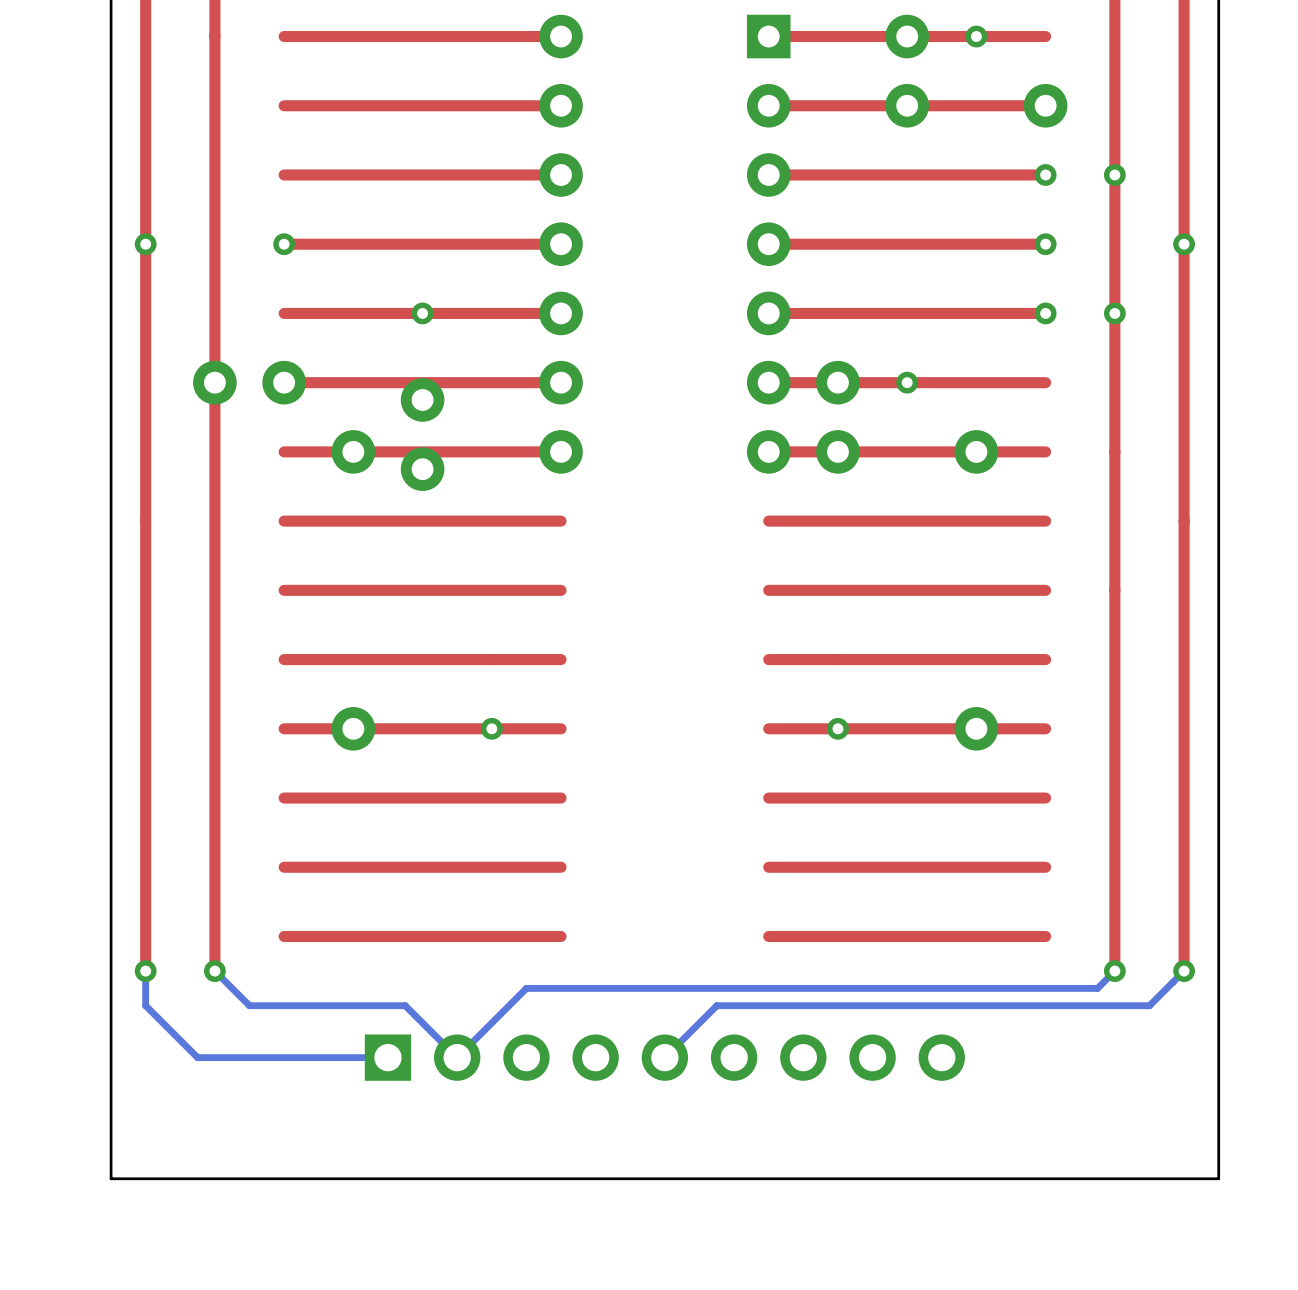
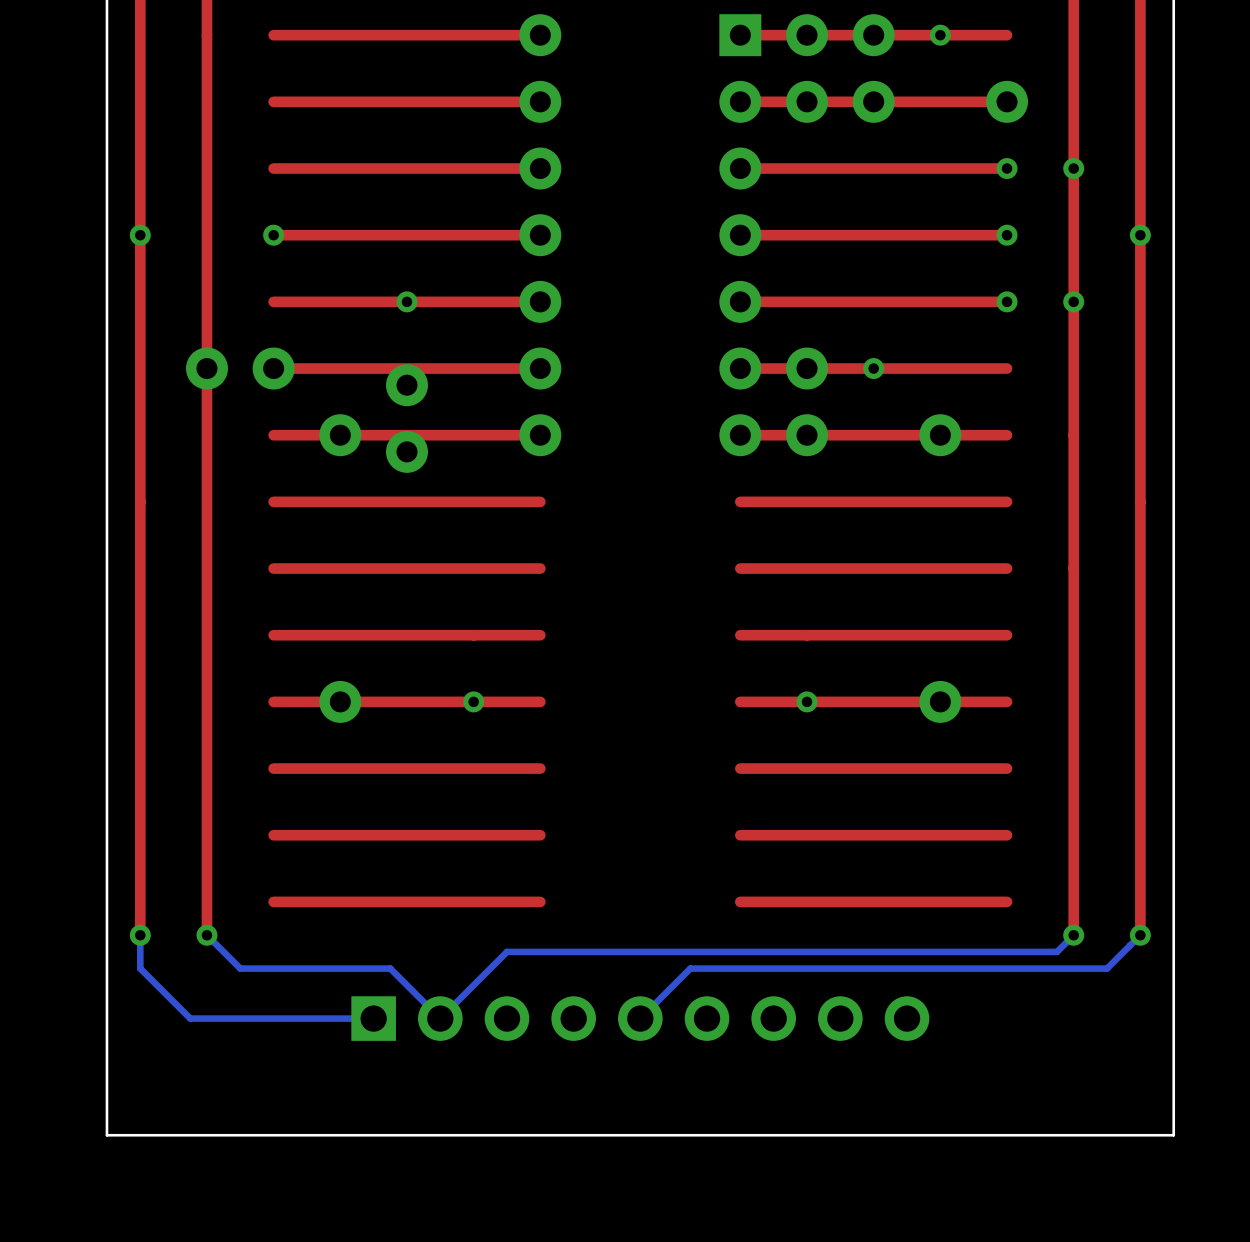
part: none -> (807, 68)

